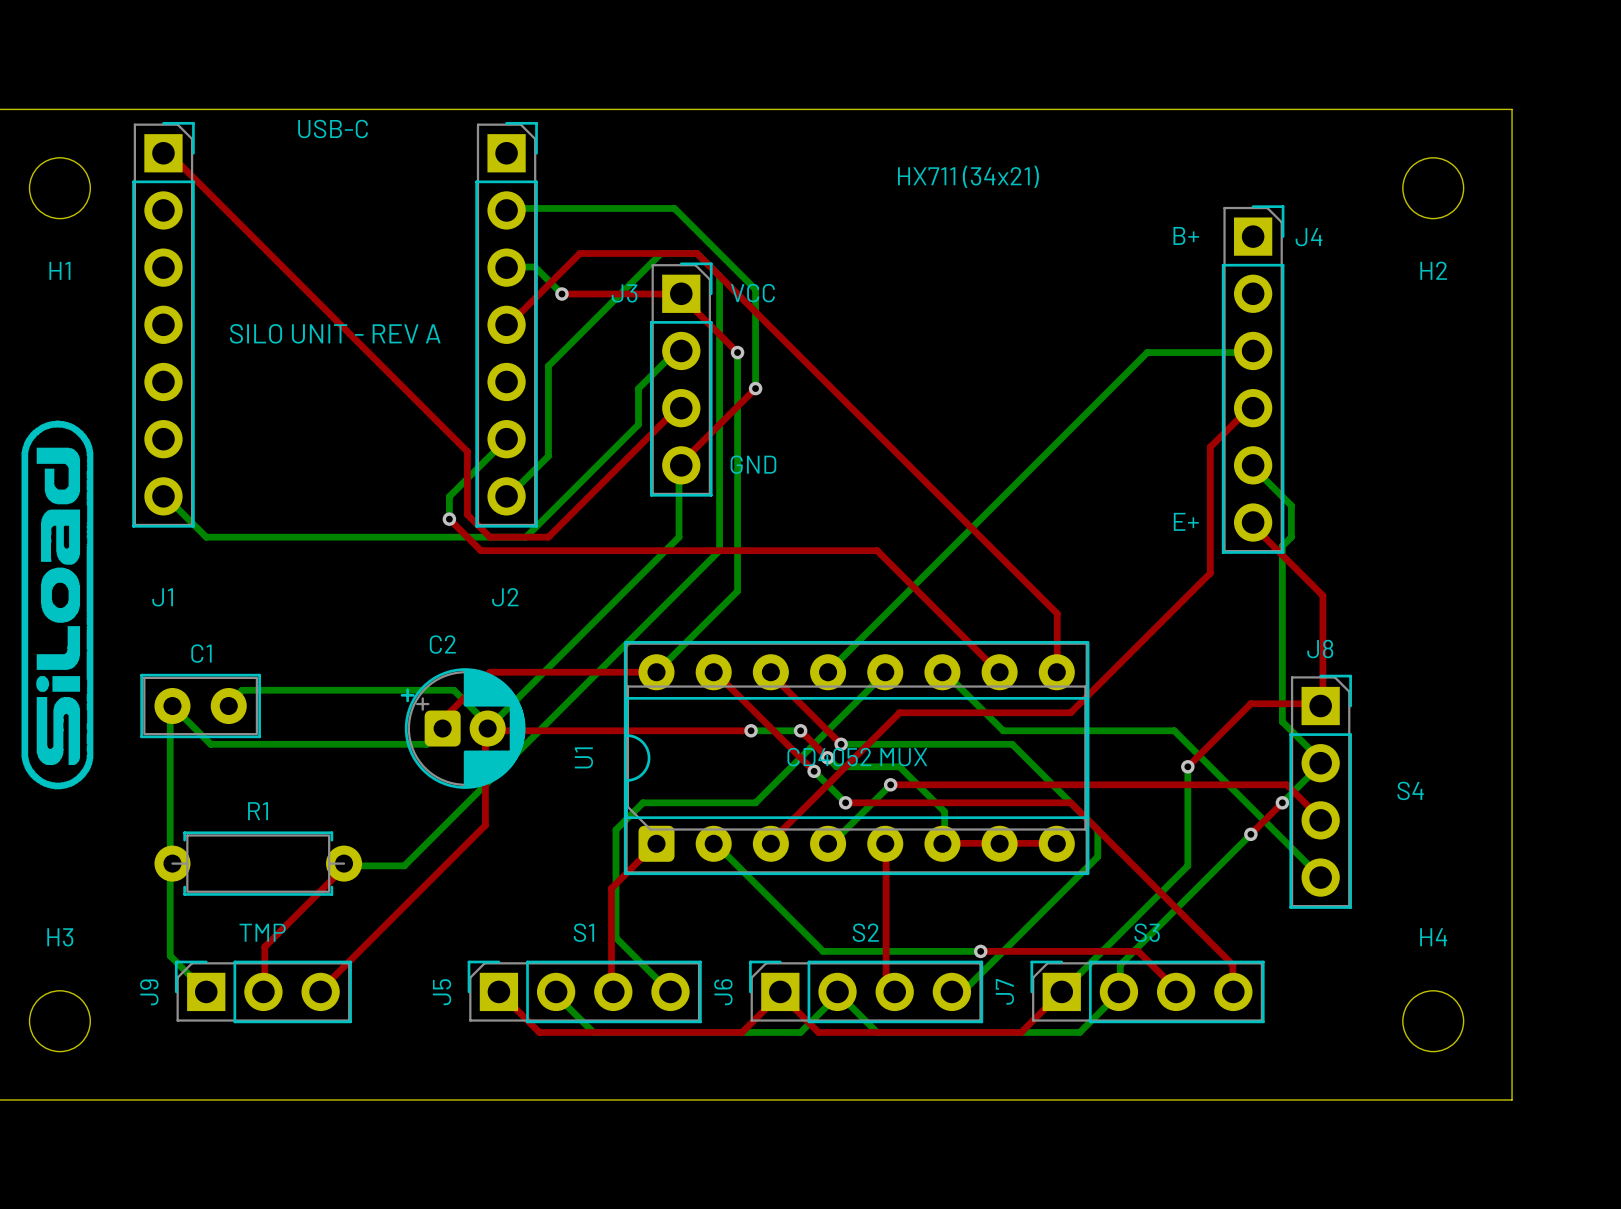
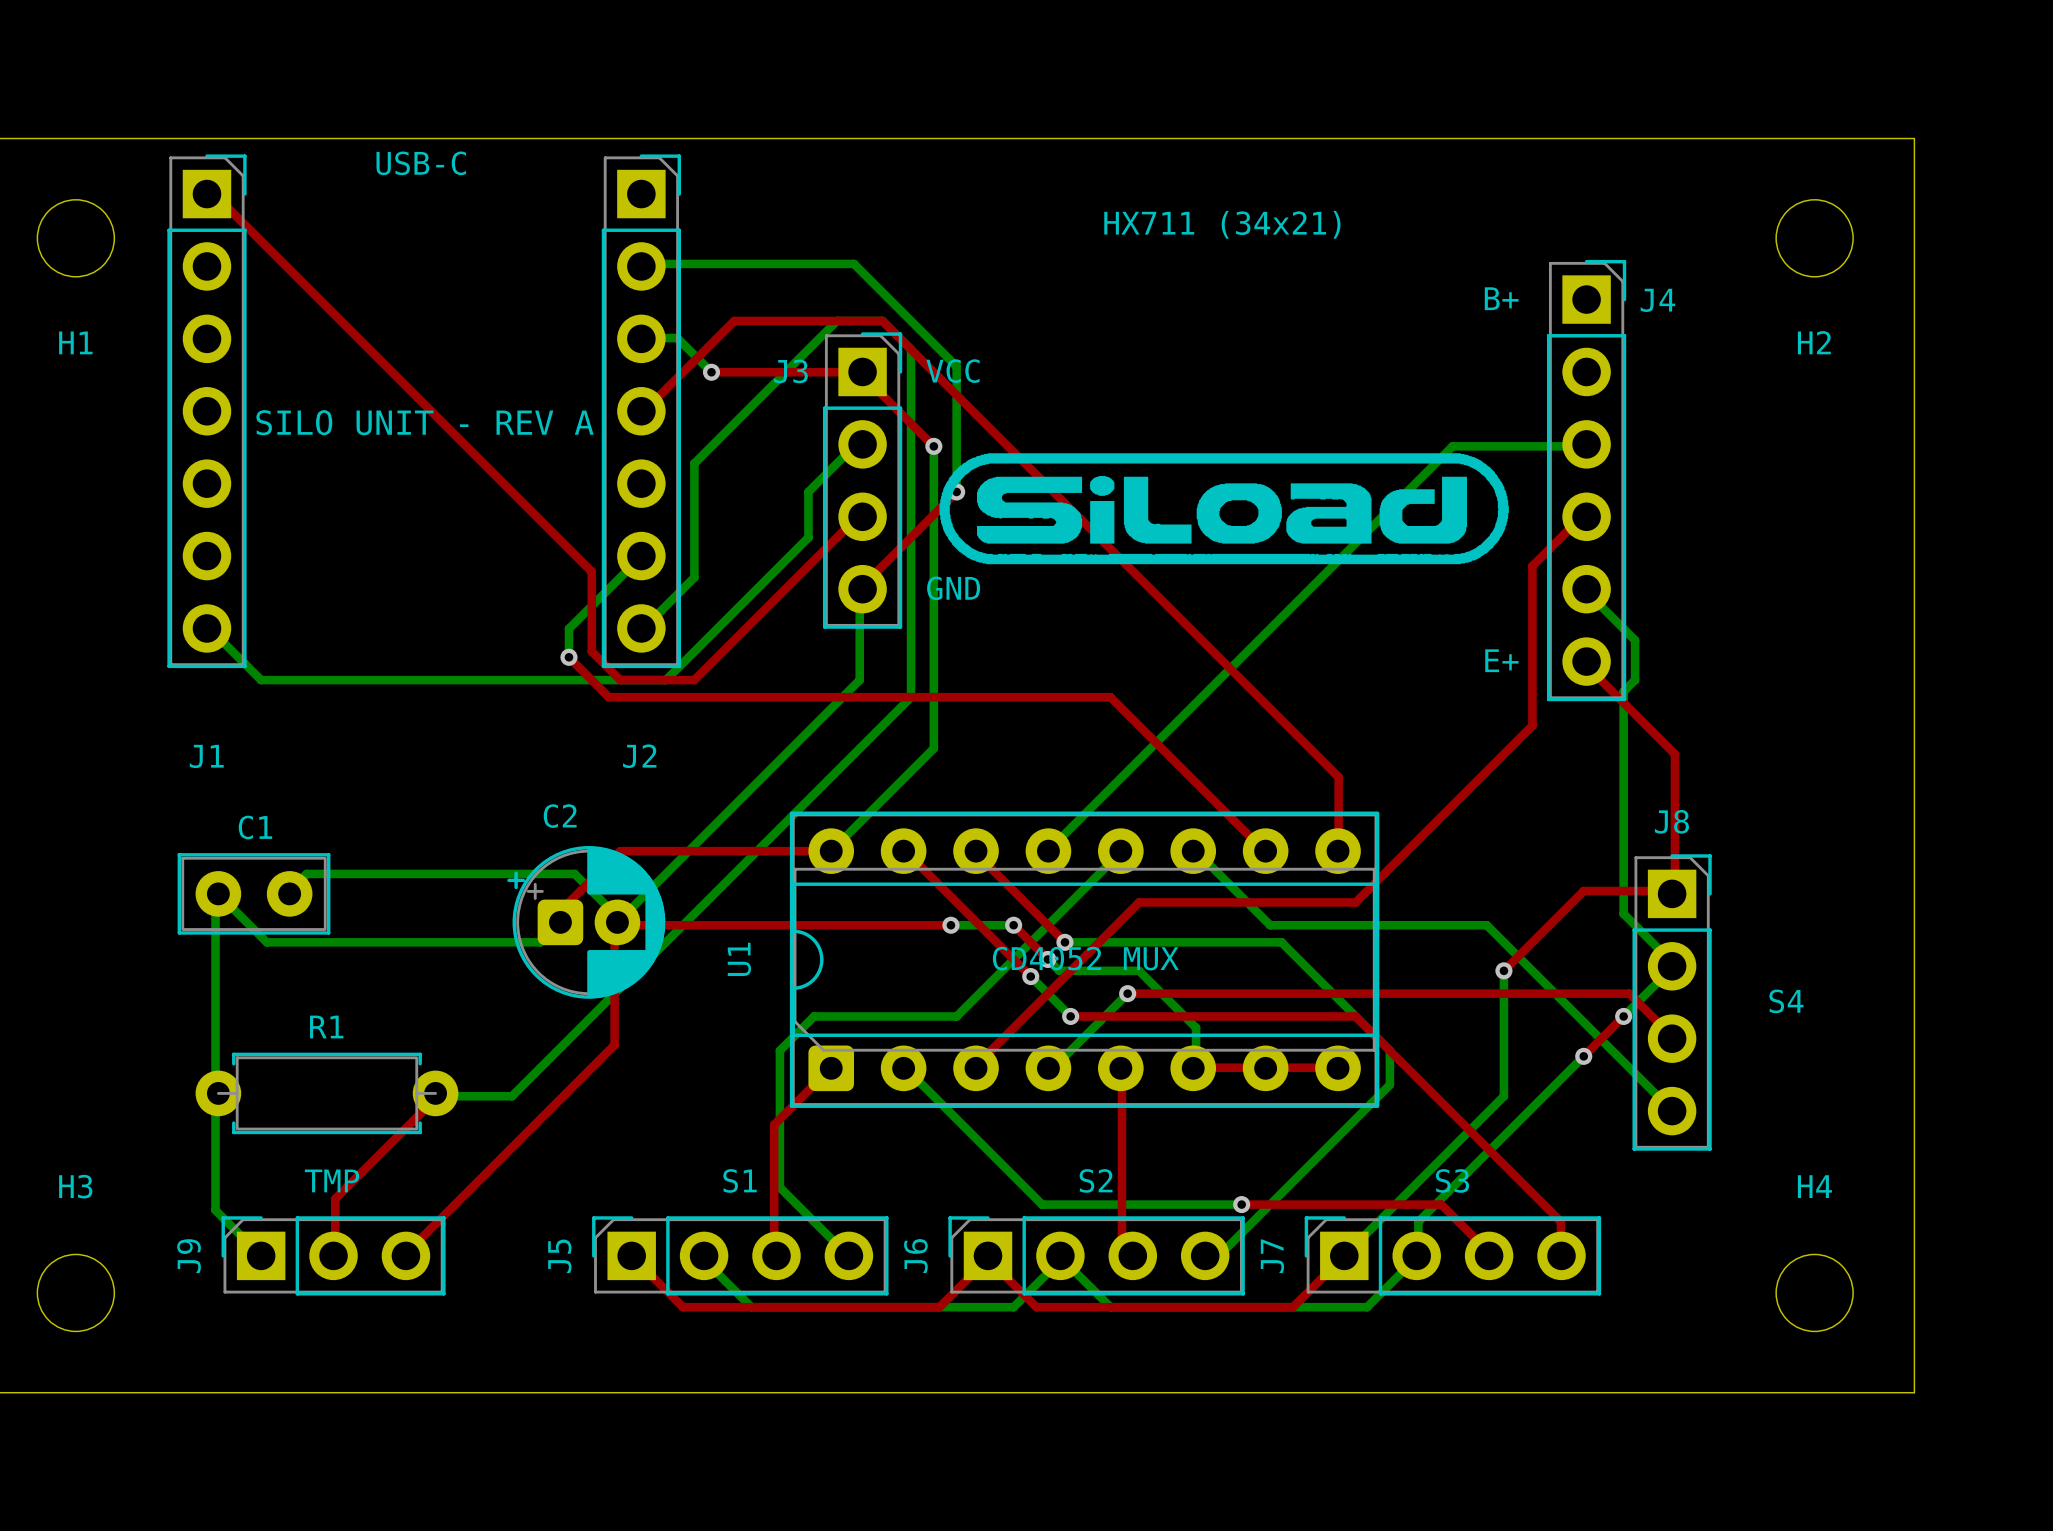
drawing: none -> [939, 453, 1509, 565]
drawing: [21, 420, 94, 790] -> none

